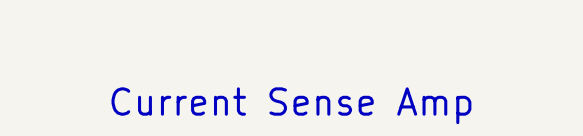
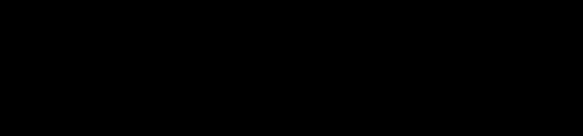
text: Current Sense Amp (291, 105) -> none

